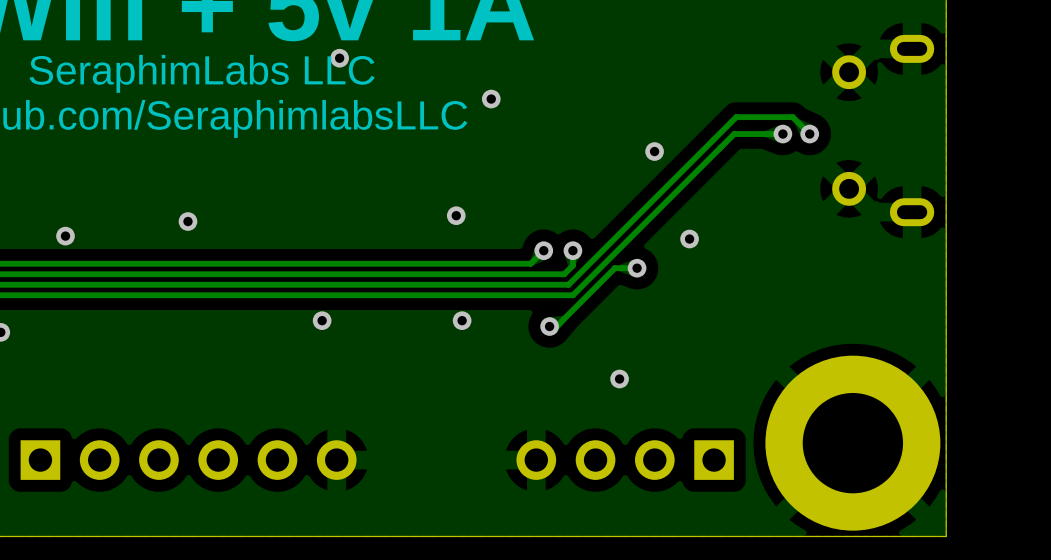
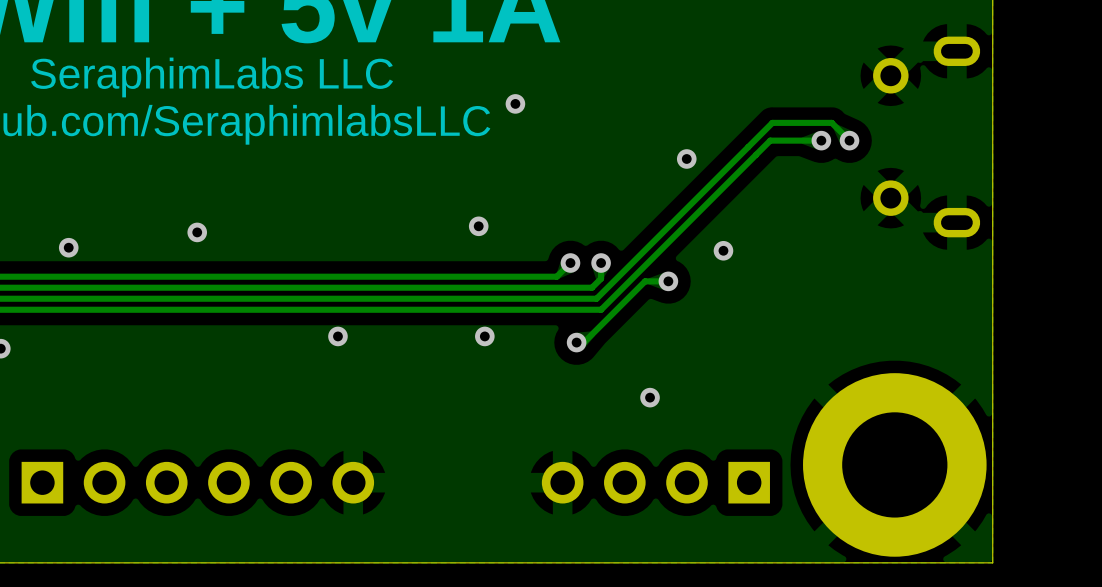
via: (339, 58) -> none

